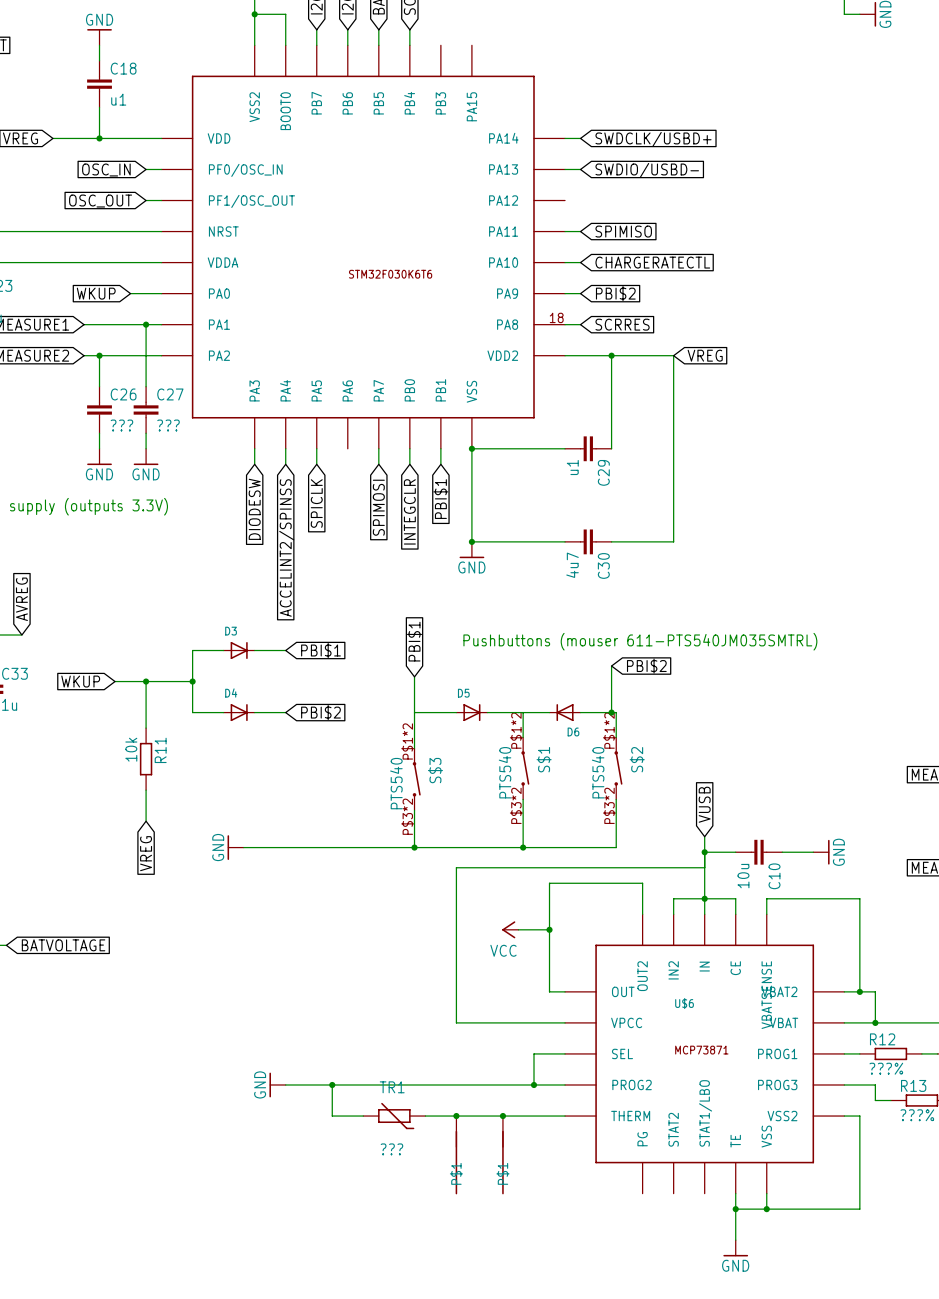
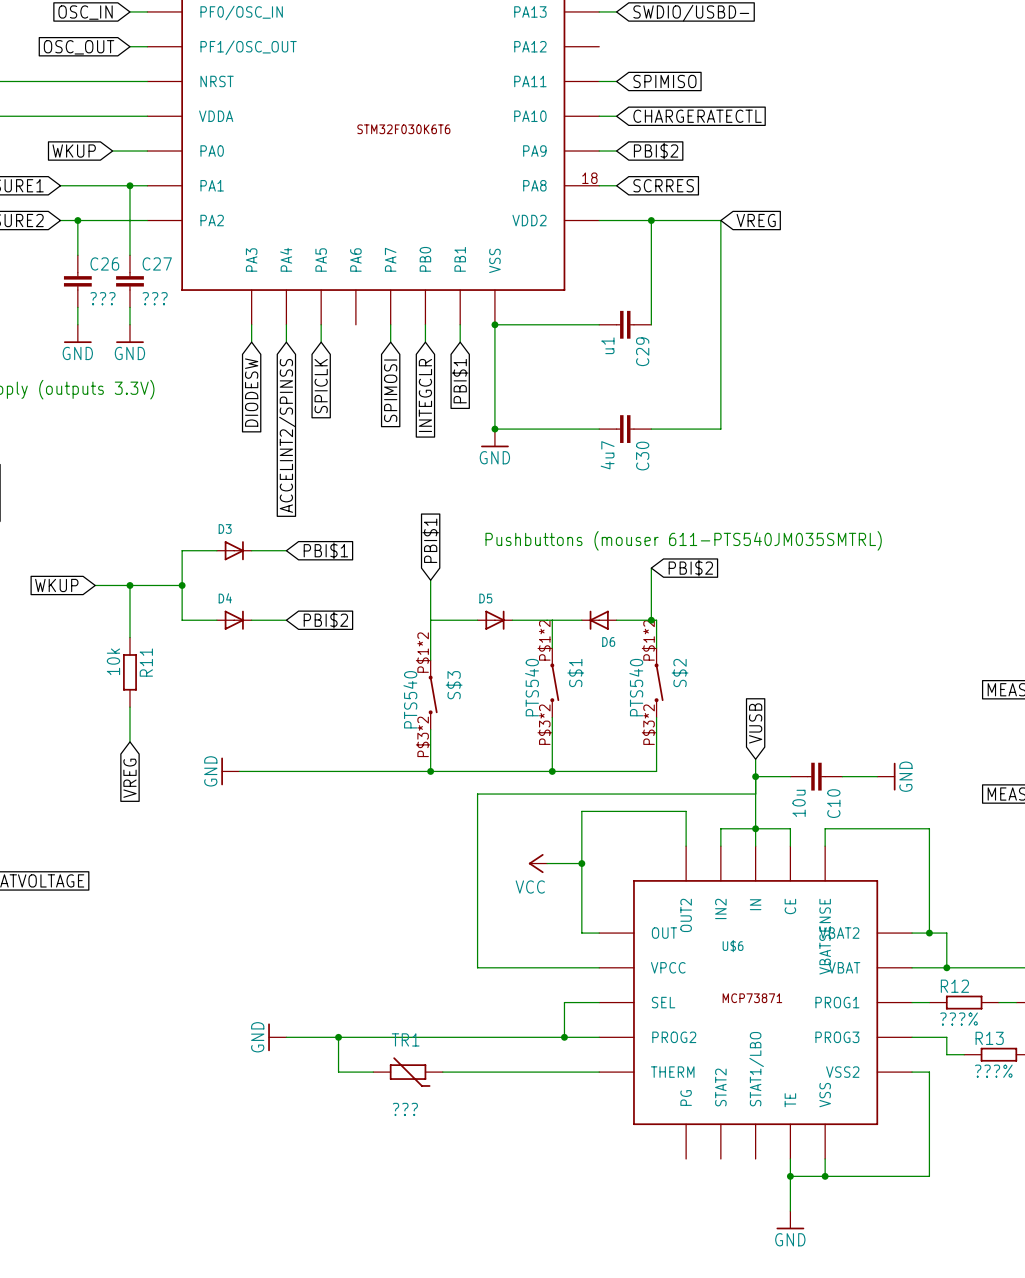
junction: (456, 1116) -> none
junction: (502, 1116) -> none
part: (456, 1155) -> none
part: (502, 1155) -> none

